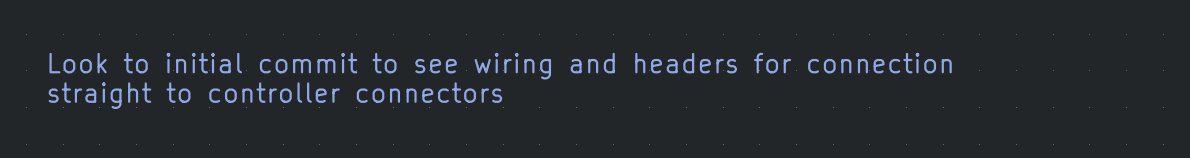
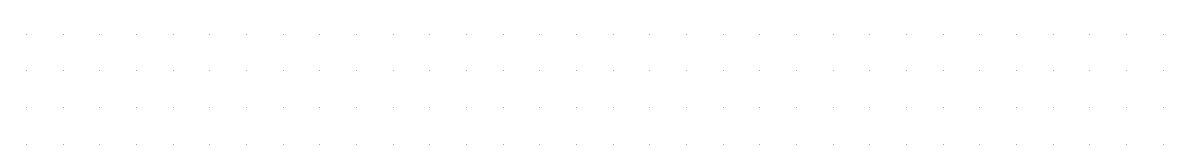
text: Look to initial commit to see wiring and headers for connection (500, 66) -> none
text: straight to controller connectors (275, 95) -> none

